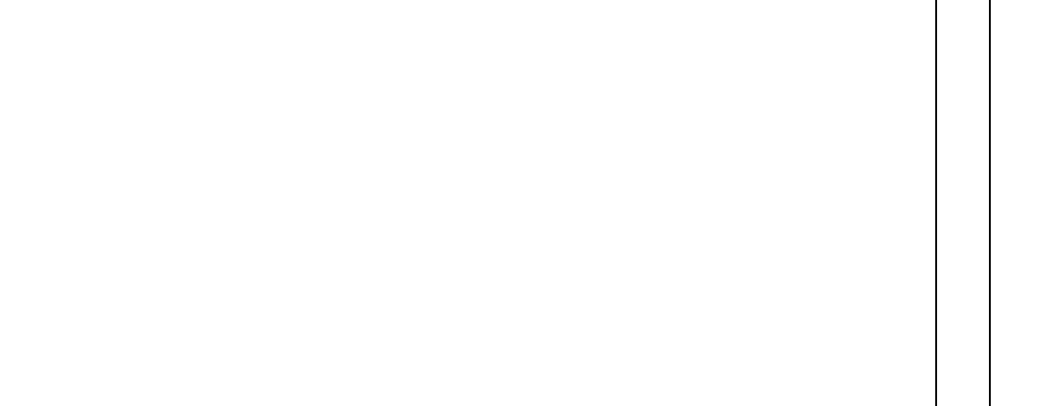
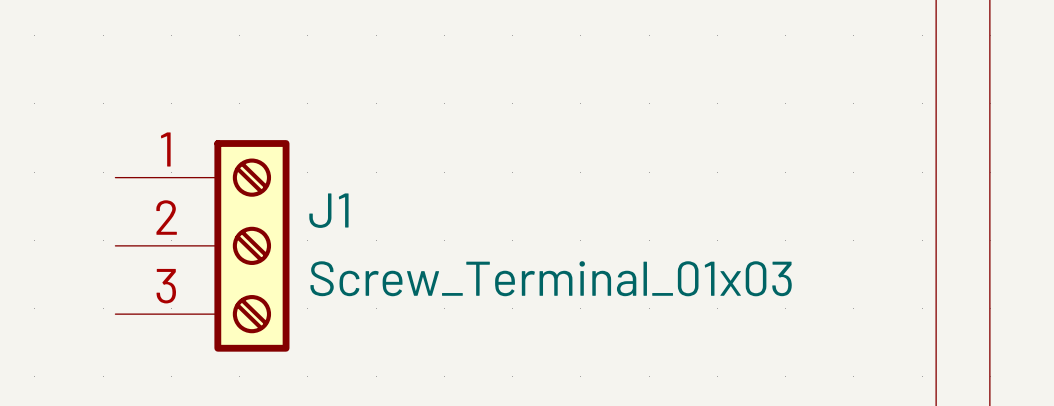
J1: none -> Screw_Terminal_01x03 (202, 245)

